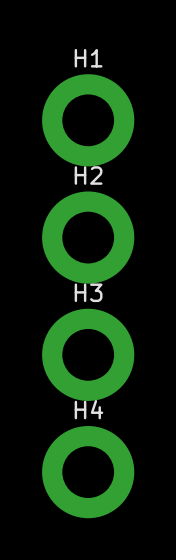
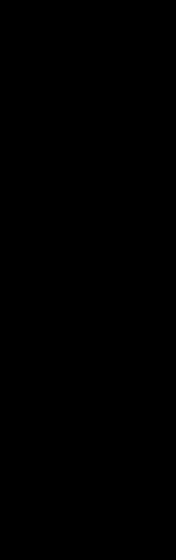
H1: (88, 120) -> none
H2: (88, 237) -> none
H3: (88, 354) -> none
H4: (88, 472) -> none

